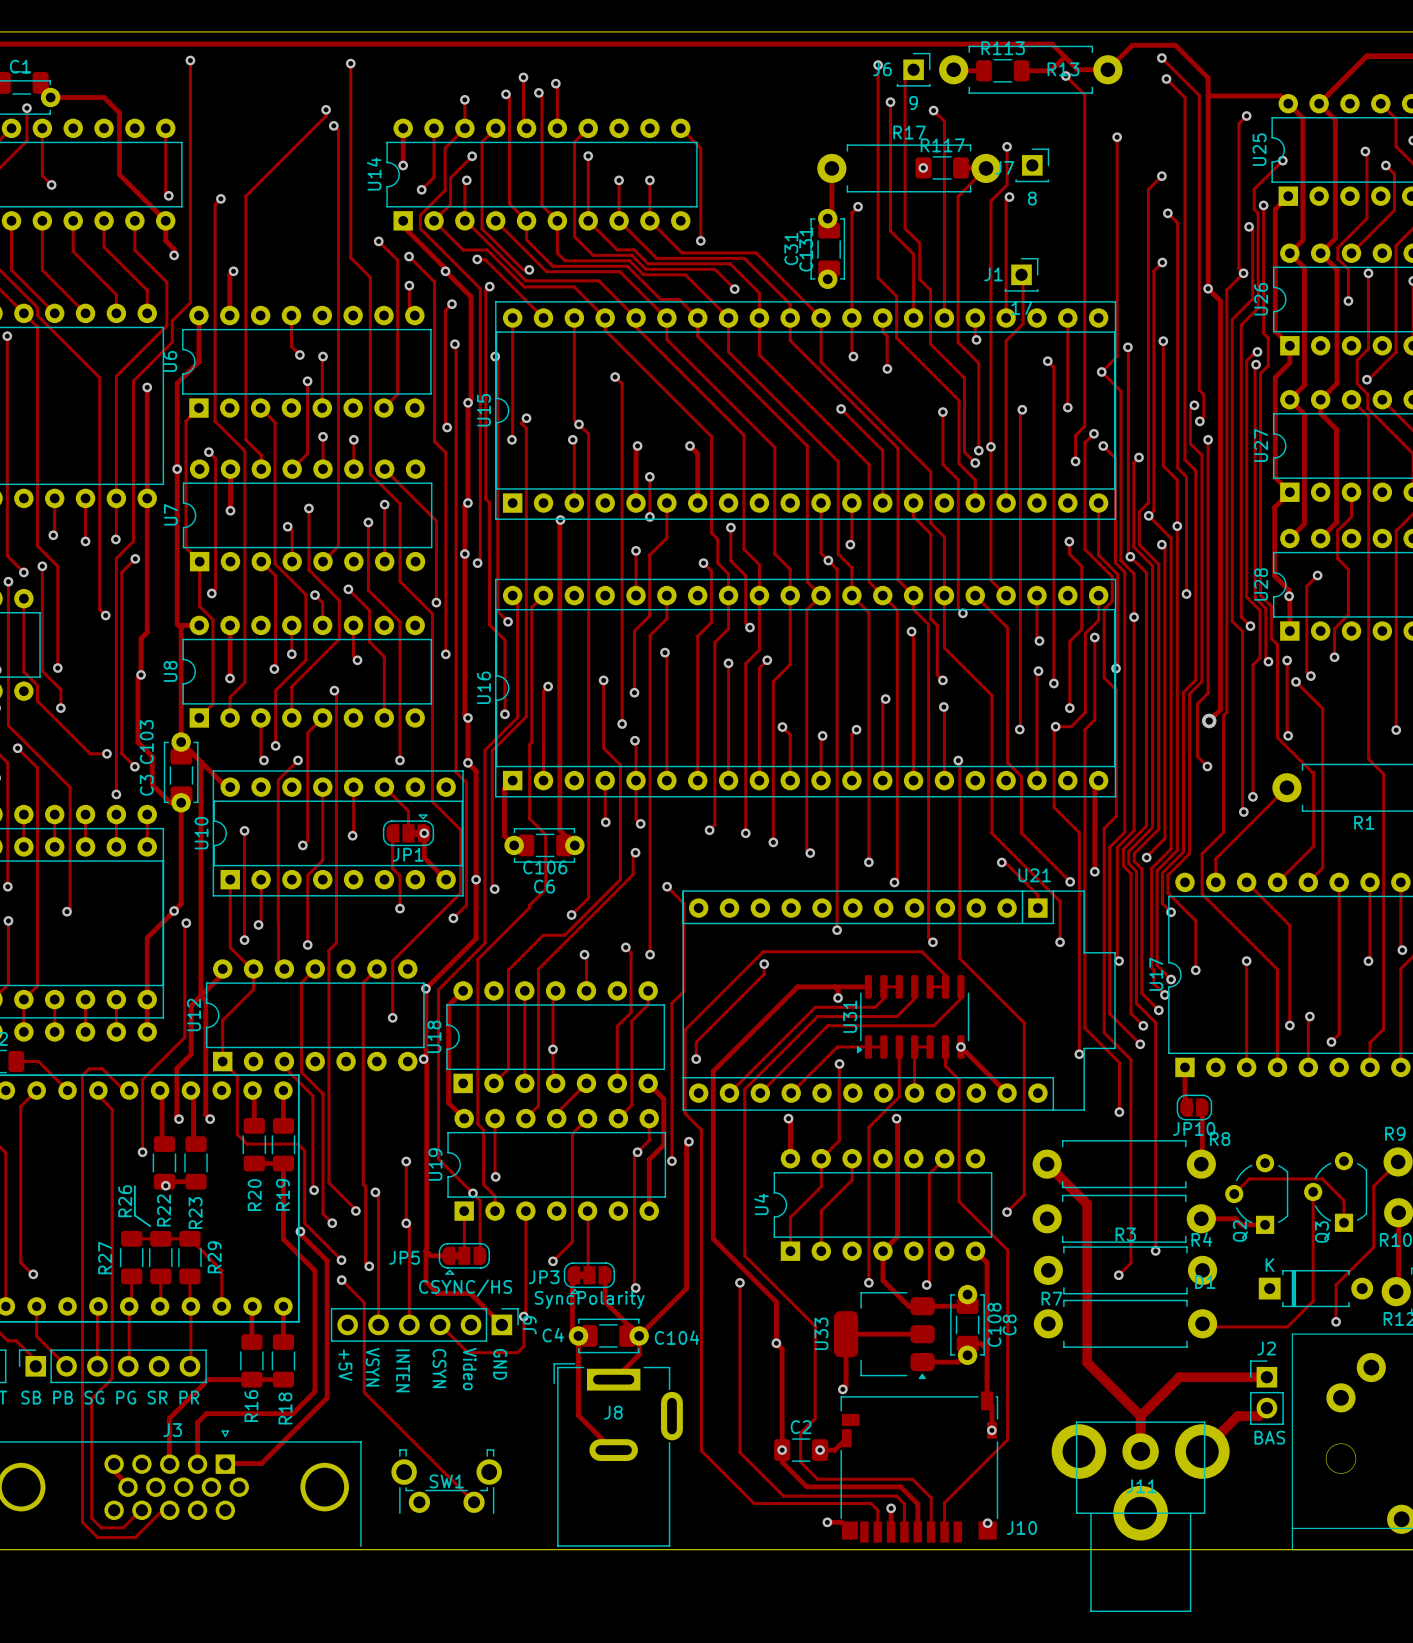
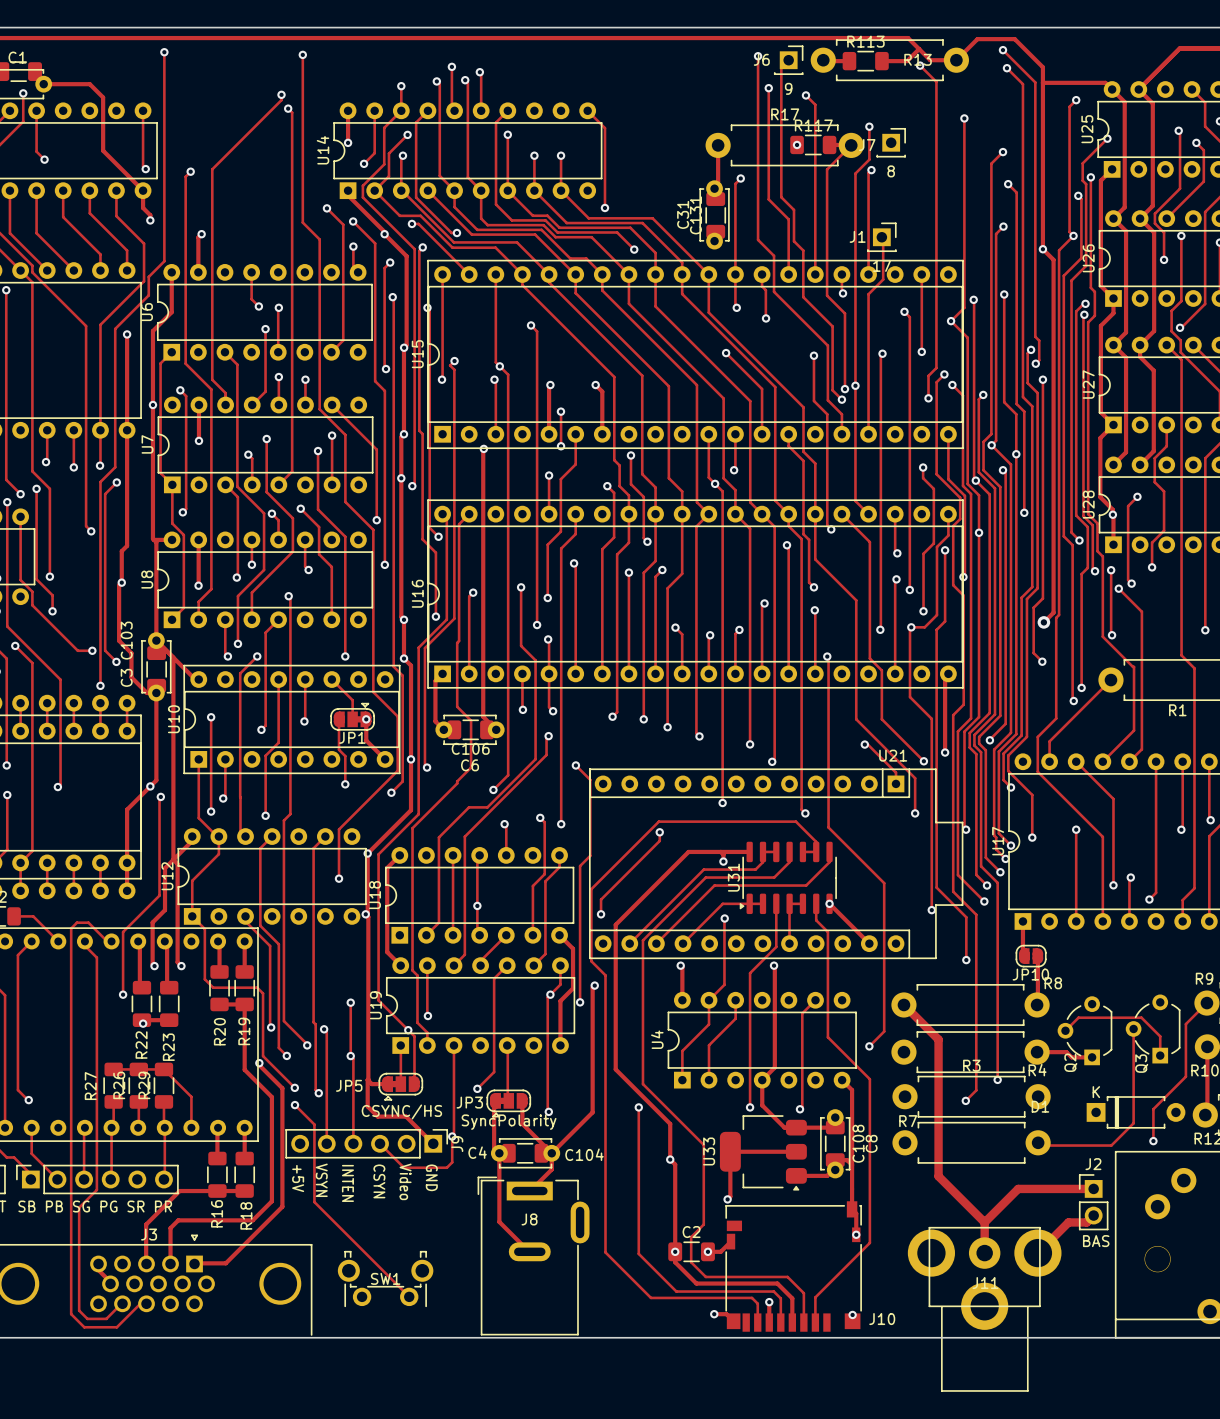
line: (134, 1186) (134, 1215) (150, 1226) -> none
R26 name position: R26 (125, 1201) -> R26 (119, 1085)
R29 name position: R29 (214, 1257) -> R29 (144, 1085)

